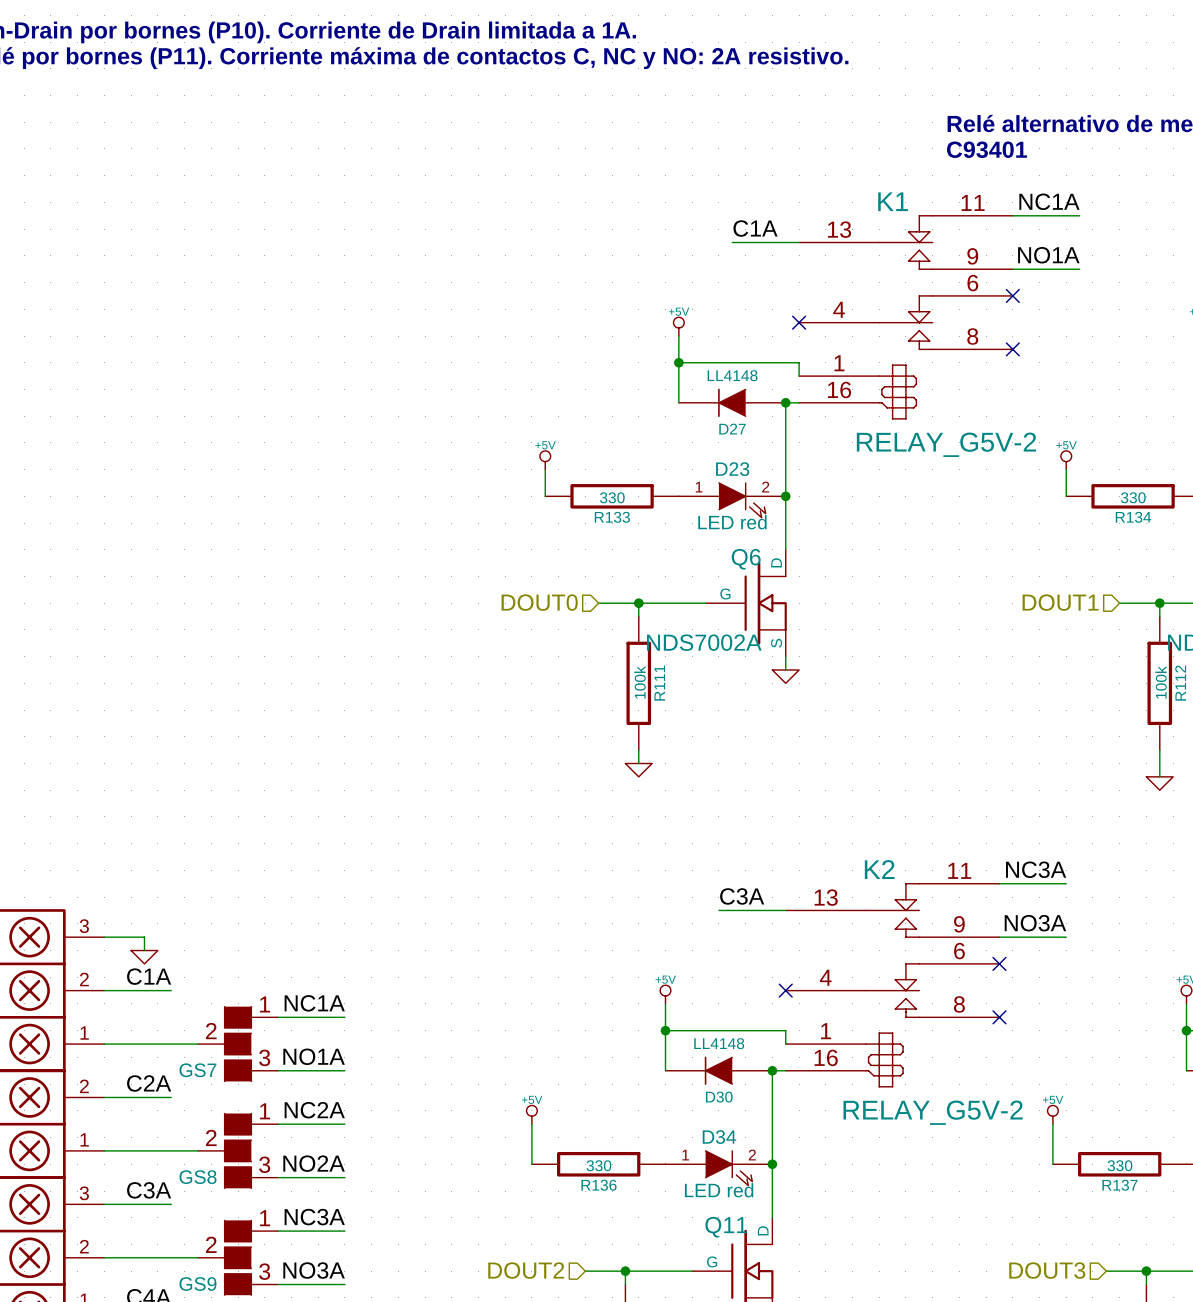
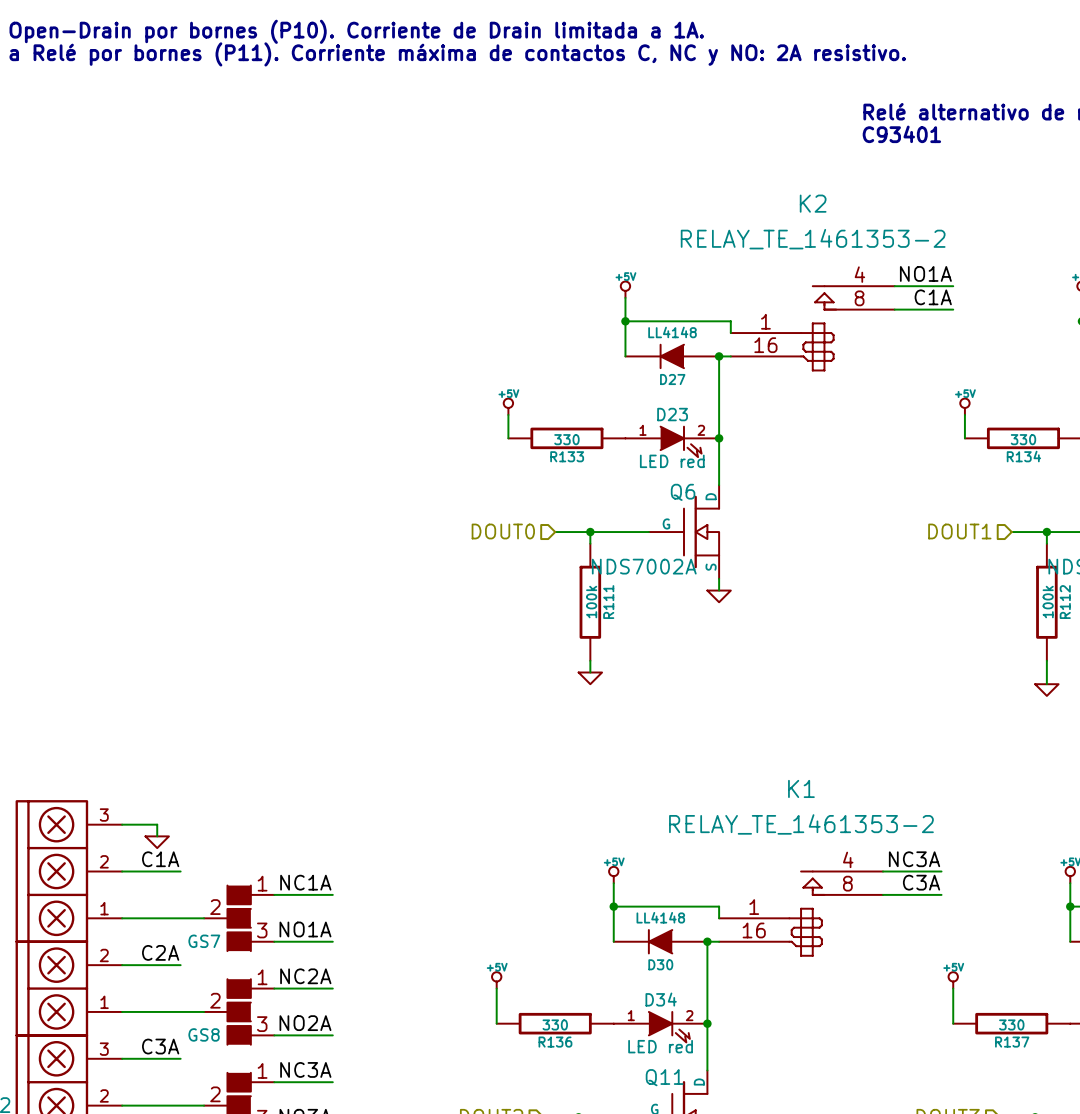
K1 name position: K1 (893, 201) -> K1 (801, 788)
label: NC1A (1049, 201) -> none
K1 symbol: [799, 215, 1013, 419] -> [719, 871, 883, 956]
wire: (1012, 215) (1079, 215) -> (894, 309) (953, 309)
label: C1A (755, 228) -> none
wire: (732, 242) (799, 242) -> none
label position: NO1A (1048, 255) -> NO1A (925, 273)
wire: (1012, 269) (1079, 269) -> (894, 286) (953, 286)
no-connect mark: (1012, 295) -> none
no-connect mark: (799, 322) -> none
label: none -> C1A (933, 297)
no-connect mark: (1012, 349) -> none
K1 value: RELAY_G5V-2 (946, 444) -> RELAY_TE_1461353-2 (801, 824)
K2 name position: K2 (879, 869) -> K2 (813, 203)
label position: NC3A (1036, 869) -> NC3A (914, 859)
K2 symbol: [785, 883, 1000, 1087] -> [730, 286, 895, 371]
wire: (999, 883) (1066, 883) -> (882, 894) (941, 894)
label: C3A (742, 896) -> none
wire: (718, 910) (785, 910) -> none
label: NO3A (1035, 923) -> none
wire: (999, 937) (1066, 937) -> (882, 871) (941, 871)
no-connect mark: (999, 963) -> none
no-connect mark: (785, 990) -> none
label: none -> C3A (921, 882)
no-connect mark: (999, 1017) -> none
K2 value: RELAY_G5V-2 (933, 1112) -> RELAY_TE_1461353-2 (813, 239)

